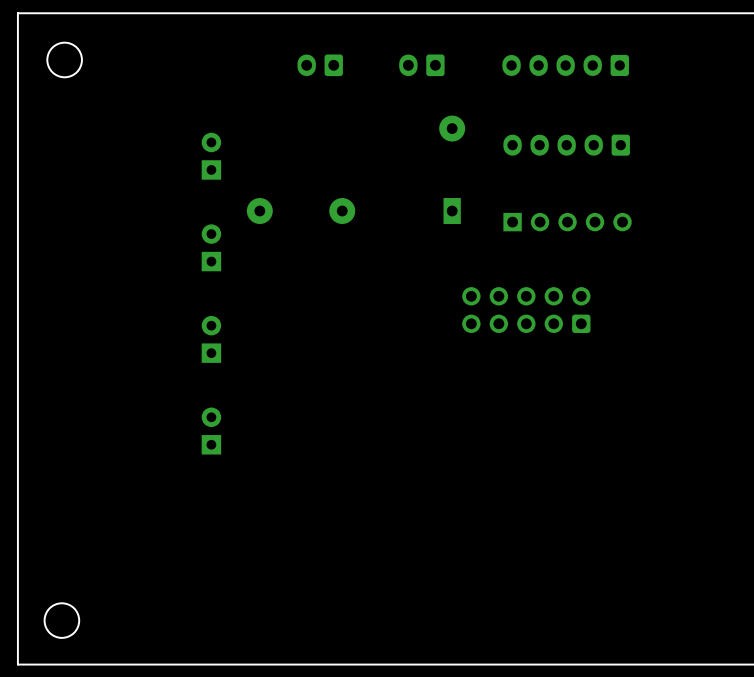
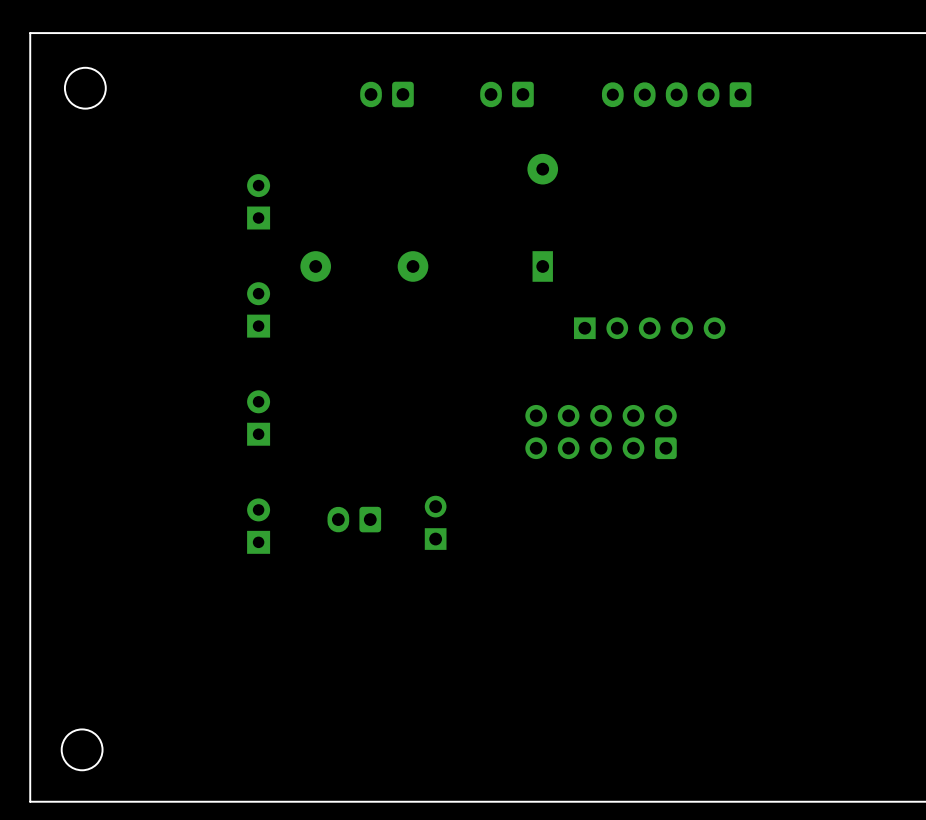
part: (566, 145) -> none
part position: (567, 222) -> (649, 328)
part position: (526, 310) -> (601, 432)
part: none -> (354, 519)
part: none -> (435, 522)

